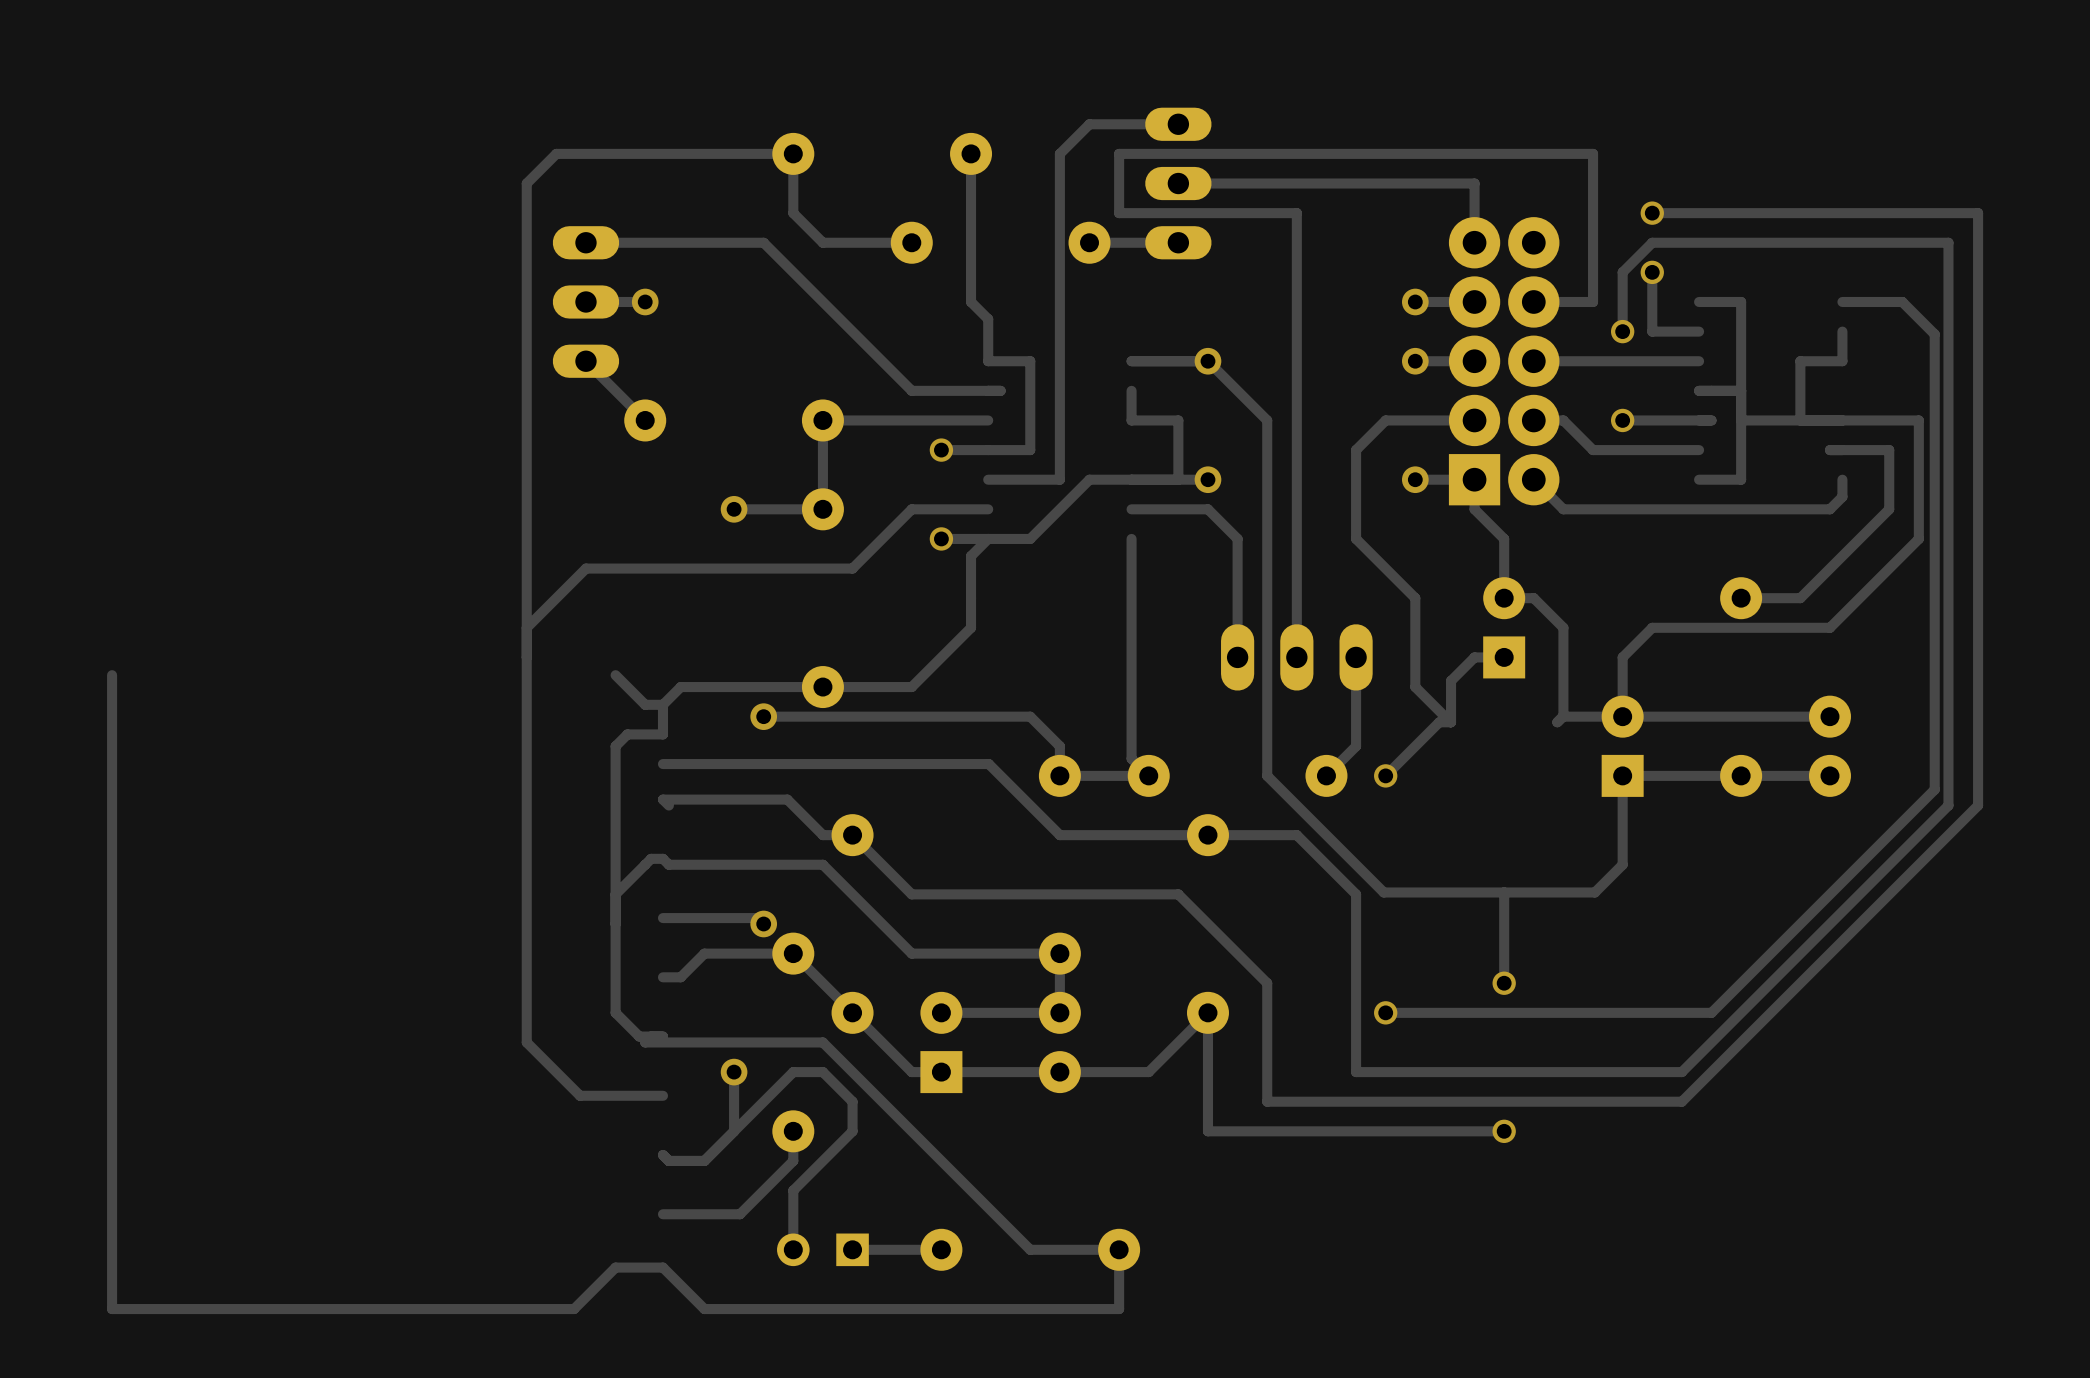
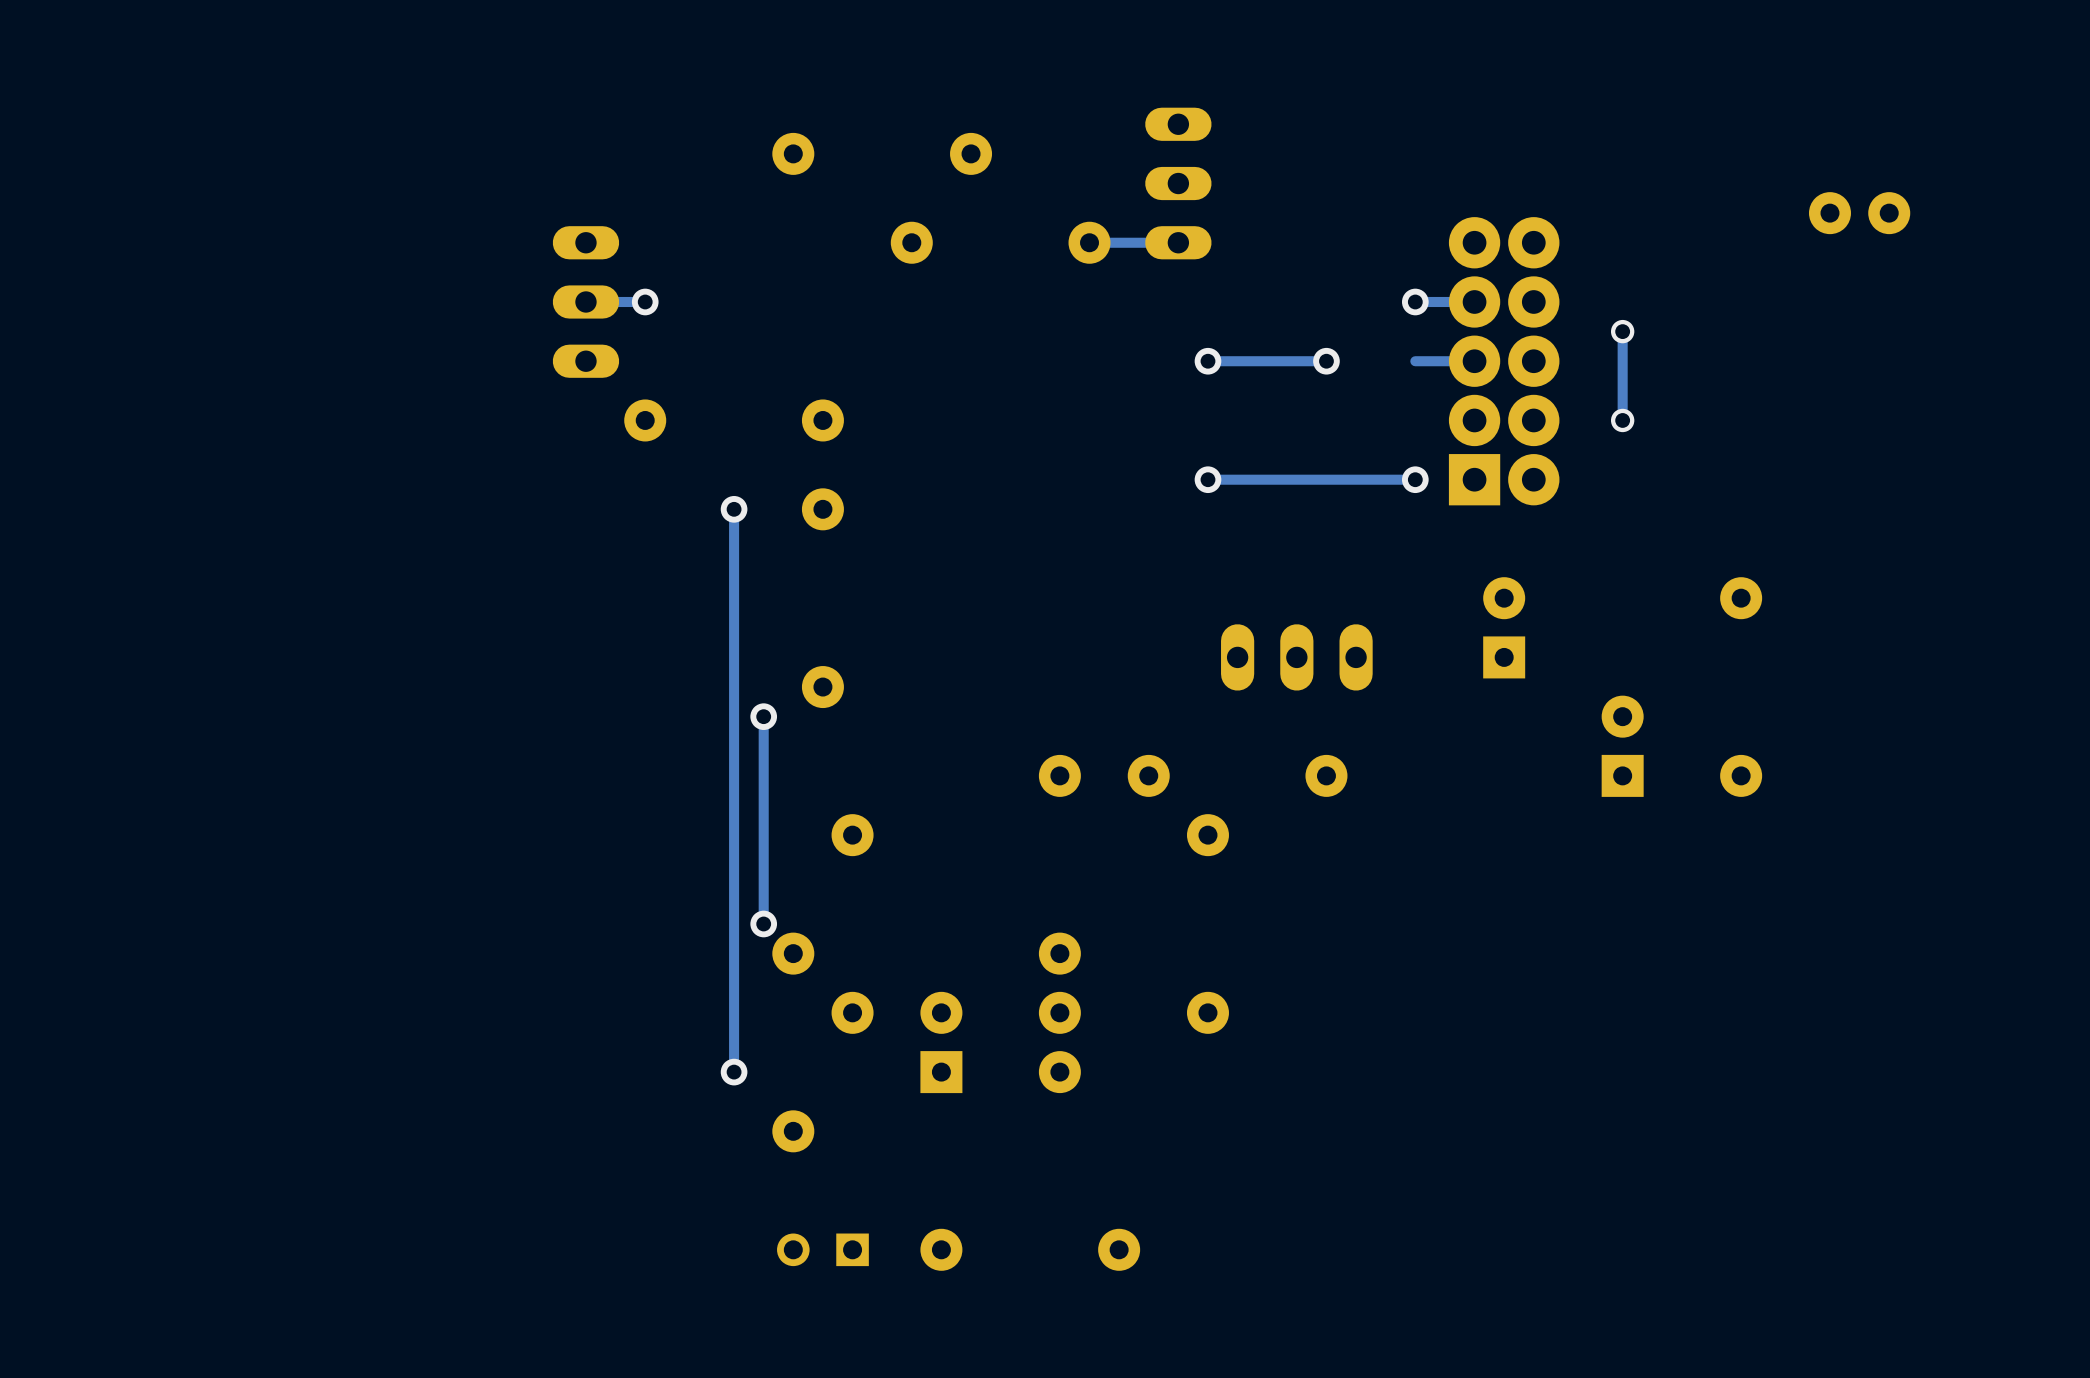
track: (1178, 124) (1089, 124) (1059, 153) (1059, 479) (988, 479) -> none
track: (971, 153) (971, 301) (988, 319) (988, 361) (1030, 361) (1030, 450) (941, 450) -> none
track: (1178, 183) (1474, 183) (1474, 242) -> none
track: (1652, 213) (1978, 213) (1978, 805) (1681, 1101) (1267, 1101) (1267, 983) (1178, 894) (911, 894) (852, 835) (822, 835) (787, 799) (662, 799) (668, 805) -> none
via: (1652, 213) -> none
track: (585, 242) (763, 242) (911, 390) (1000, 390) -> none
track: (911, 242) (822, 242) (793, 213) (793, 153) (556, 153) (526, 183) (526, 1042) (580, 1095) (662, 1095) -> none
track: (1652, 272) (1652, 331) (1699, 331) -> none
via: (1652, 272) -> none
track: (1533, 301) (1593, 301) (1593, 153) (1119, 153) (1119, 213) (1296, 213) (1296, 657) -> none
track: (1699, 301) (1741, 301) (1741, 479) (1699, 479) -> none
track: (1842, 301) (1902, 301) (1934, 334) (1934, 789) (1711, 1012) (1385, 1012) -> none
track: (1622, 331) (1622, 272) (1652, 242) (1948, 242) (1948, 805) (1681, 1072) (1356, 1072) (1356, 894) (1296, 835) (1059, 835) (988, 764) (662, 764) -> none
track: (1842, 331) (1842, 361) (1800, 361) (1800, 420) -> none
track: (585, 361) (645, 420) -> none
track: (1131, 361) (1207, 361) (1267, 420) (1267, 775) (1383, 892) (1594, 892) (1622, 864) (1622, 775) (1829, 775) -> none
track: none -> (1326, 361) (1207, 361)
via position: (1415, 361) -> (1326, 361)
track: (1699, 361) (1533, 361) -> none
track: (1131, 390) (1131, 420) (1178, 420) (1178, 479) -> none
track: (1741, 390) (1699, 390) -> none
track: (988, 420) (822, 420) (822, 509) (734, 509) -> none
track: (1474, 420) (1385, 420) (1356, 450) (1356, 538) (1415, 598) (1415, 687) (1450, 722) -> none
track: (1533, 420) (1563, 420) (1593, 450) (1699, 450) -> none
track: (1711, 420) (1622, 420) -> (1622, 331) (1622, 420)
track: (1741, 420) (1918, 420) (1918, 538) (1829, 627) (1652, 627) (1622, 657) (1622, 716) -> none
via: (941, 450) -> none
track: (1829, 450) (1889, 450) (1889, 509) (1800, 598) (1741, 598) -> none
track: (1207, 479) (1089, 479) (1030, 538) (941, 538) -> none
track: (1415, 479) (1474, 479) (1474, 509) (1504, 538) (1504, 598) (1533, 598) (1563, 627) (1563, 716) (1557, 722) -> (1415, 479) (1207, 479)
track: (1842, 479) (1842, 496) (1829, 509) (1563, 509) (1533, 479) -> none
track: (988, 509) (911, 509) (852, 568) (585, 568) (526, 627) -> none
track: (1131, 509) (1207, 509) (1237, 538) (1237, 657) -> none
via: (941, 538) -> none
track: (988, 538) (971, 556) (971, 627) (911, 687) (680, 687) (662, 704) -> none
track: (1131, 538) (1131, 758) (1148, 775) (1059, 775) (1059, 746) (1030, 716) (763, 716) -> none
track: (1356, 657) (1356, 746) (1326, 775) -> none
track: (1504, 657) (1474, 657) (1451, 680) (1451, 722) (1439, 722) (1385, 775) -> none
track: (112, 675) (112, 1309) (574, 1309) (615, 1267) (662, 1267) (704, 1309) (1119, 1309) (1119, 1249) (1030, 1249) (822, 1042) (645, 1042) (651, 1036) -> none
track: (615, 675) (645, 704) (662, 704) -> none
track: (662, 704) (662, 734) (627, 734) (615, 746) (615, 1012) (639, 1036) (662, 1036) -> none
track: (1829, 716) (1562, 716) -> none
part rotation: 0° (1829, 746) -> 90° clockwise (1859, 213)
part position: (1829, 746) -> (1859, 213)
via: (1385, 775) -> none
track: (1504, 892) (1504, 983) -> none
track: (615, 894) (651, 858) (662, 858) (668, 864) (822, 864) (911, 953) (1059, 953) (1059, 1012) (941, 1012) -> none
track: (662, 918) (757, 918) (763, 923) -> (763, 716) (763, 923)
track: (662, 977) (680, 977) (704, 953) (793, 953) (911, 1072) (1148, 1072) (1207, 1012) (1207, 1131) (1504, 1131) -> none
via: (1504, 983) -> none
via: (1385, 1012) -> none
track: (734, 1072) (734, 1131) -> (734, 1072) (734, 509)
track: (793, 1131) (793, 1160) (740, 1214) (662, 1214) -> none
via: (1504, 1131) -> none
track: (662, 1155) (668, 1160) (704, 1160) (793, 1072) (822, 1072) (852, 1101) (852, 1131) (793, 1190) (793, 1249) -> none
track: (941, 1249) (852, 1249) -> none

